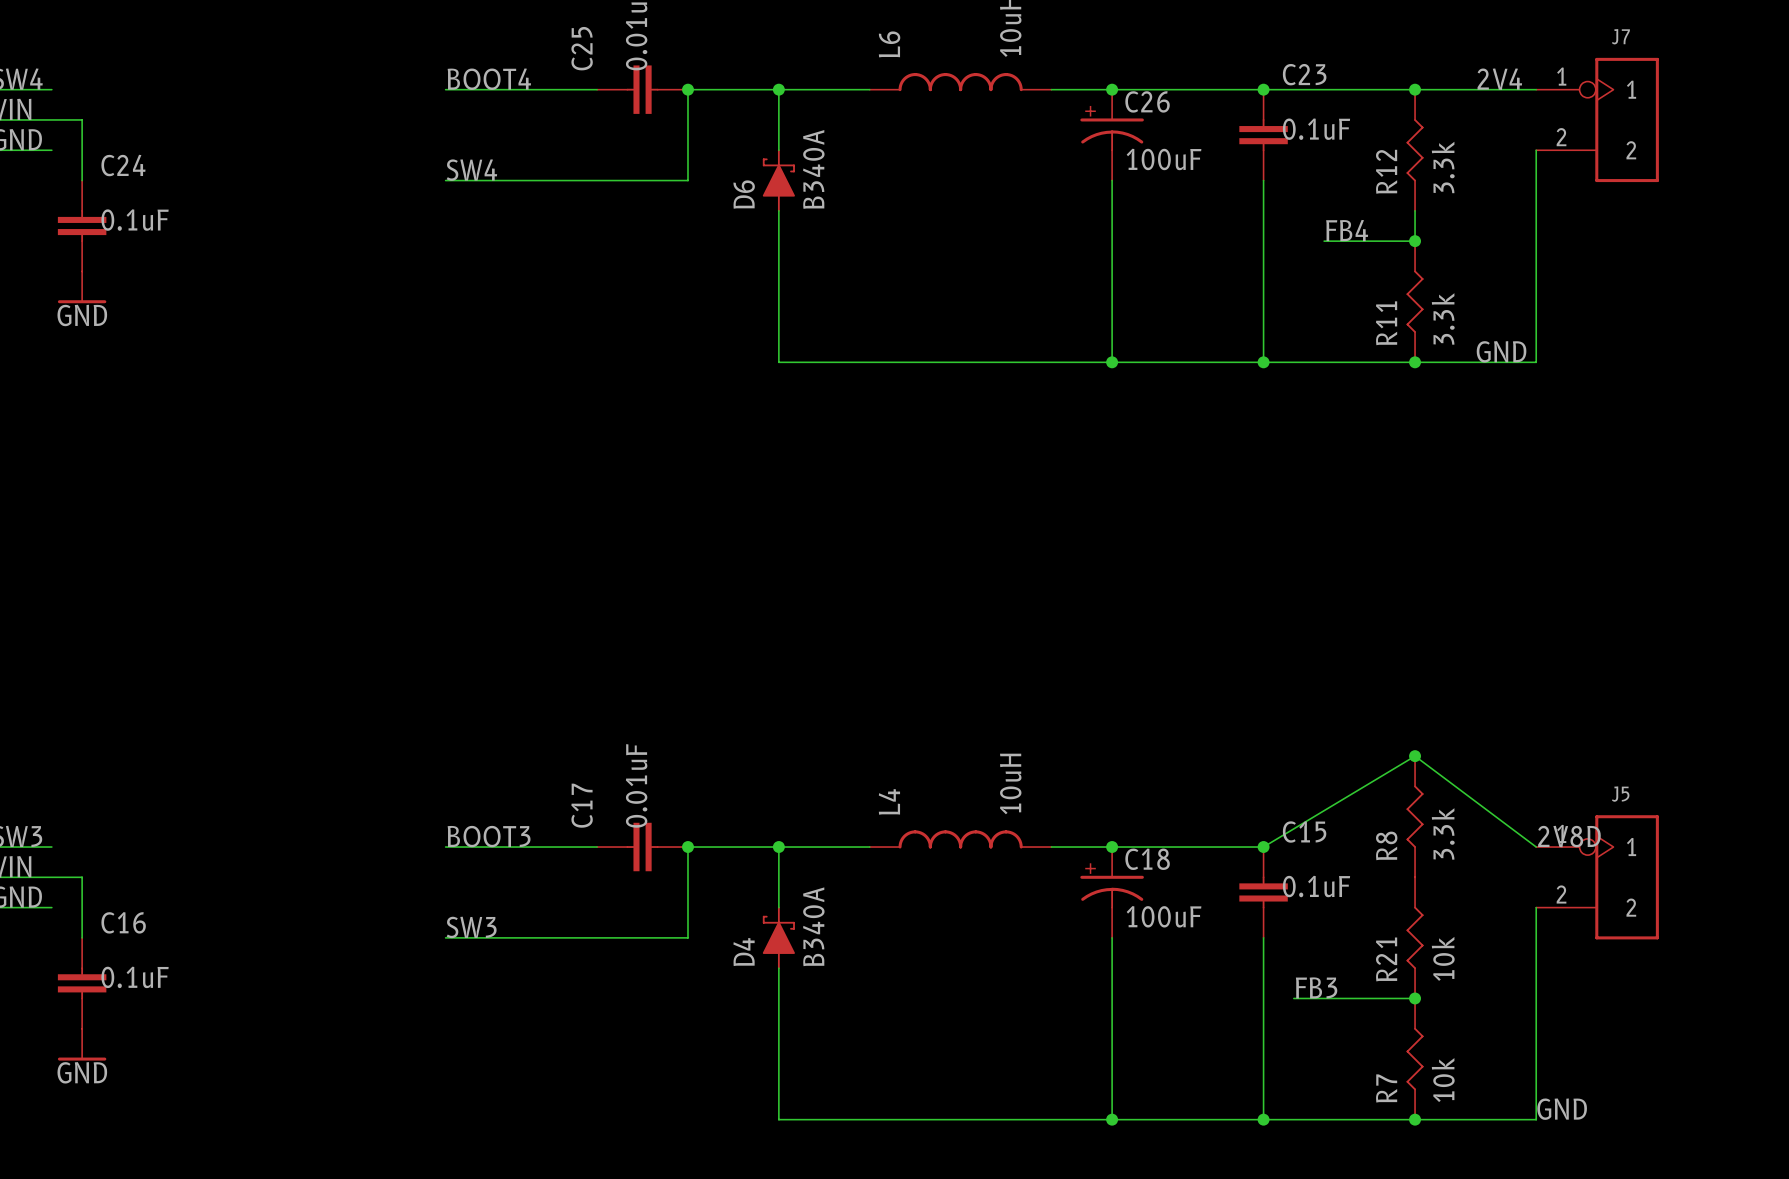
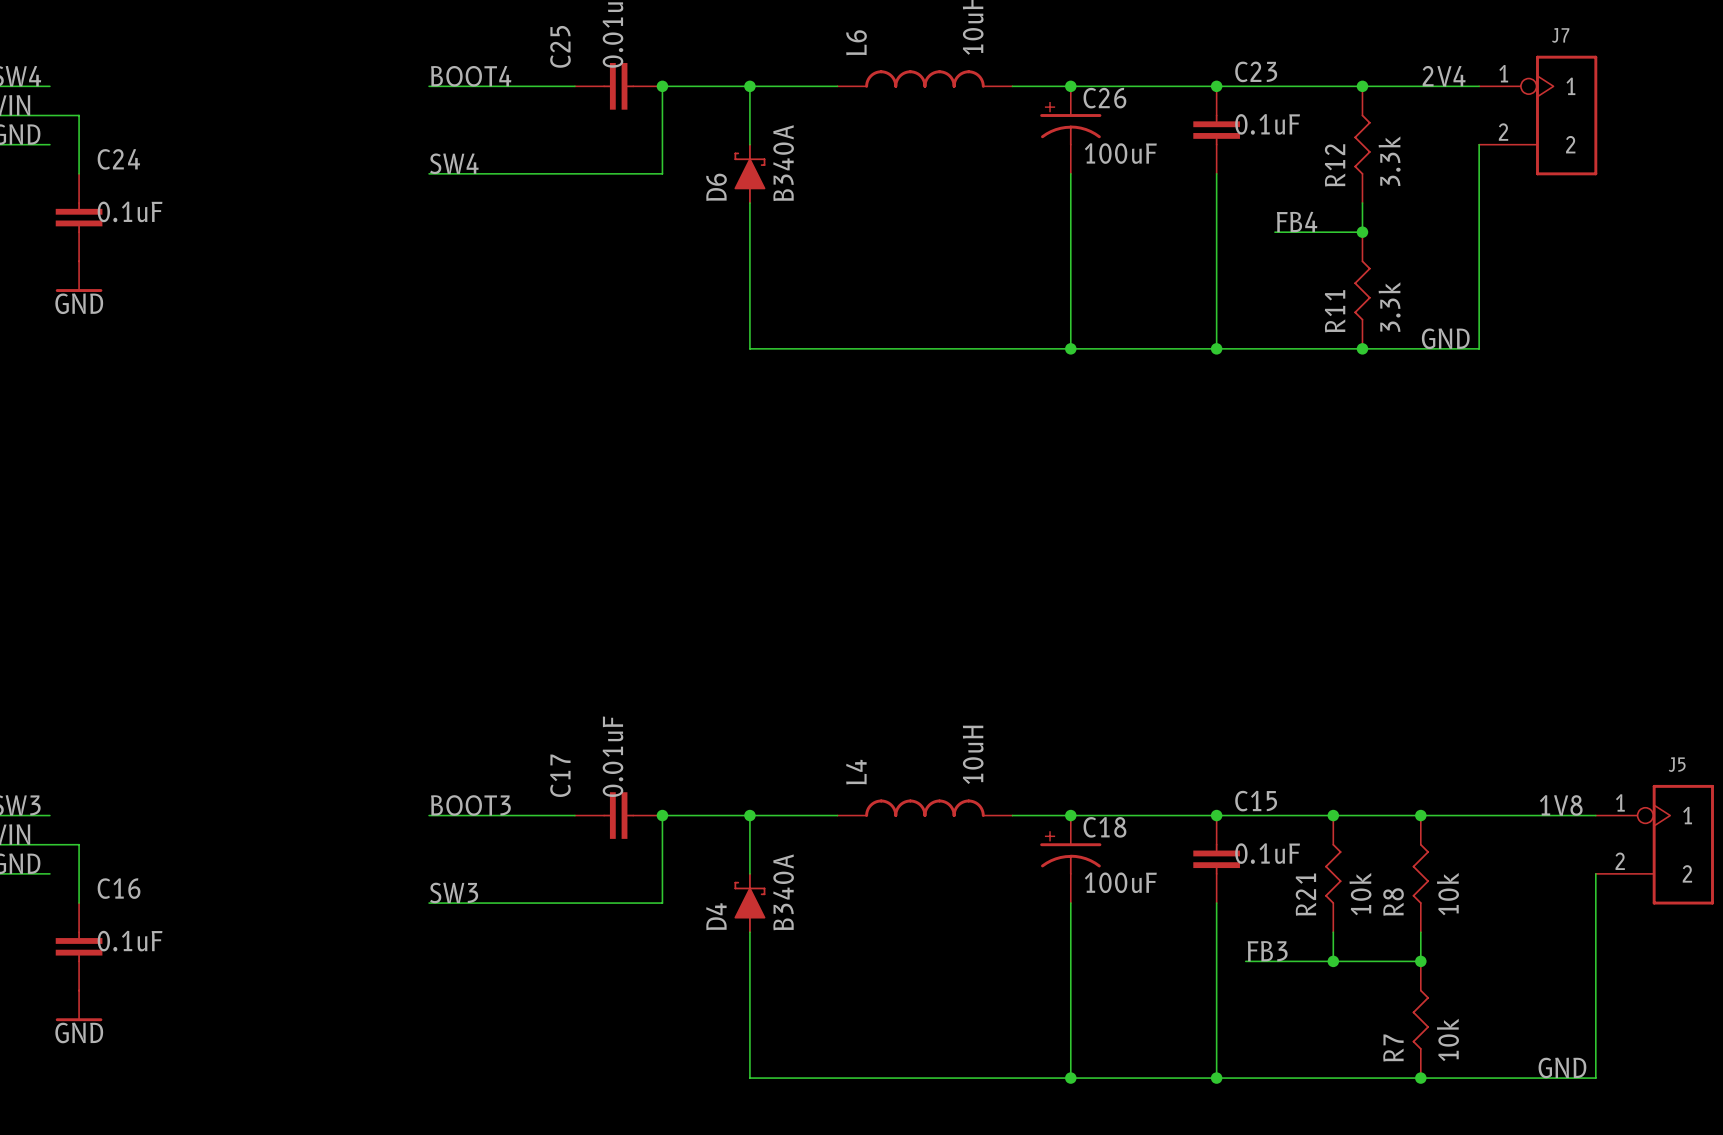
junction: (1415, 756) -> none
R8 position: (1415, 816) -> (1420, 873)
R8 value: 3.3k (1443, 833) -> 10k (1447, 894)
label: 2V8D (1569, 836) -> none
label: none -> 1V8 (1561, 805)
wire: (1263, 847) (1415, 756) (1536, 847) -> (1216, 815) (1595, 815)
junction: none -> (1333, 815)
junction: none -> (1420, 815)
J5 position: (1597, 877) -> (1654, 844)
wire: (1536, 907) (1536, 1119) -> (1595, 873) (1595, 1078) (1479, 1078)
R21 position: (1415, 937) -> (1333, 873)
wire: none -> (1333, 932) (1333, 961)
wire: none -> (1420, 932) (1420, 961) (1362, 961)
junction: none -> (1333, 961)
junction: (1415, 998) -> none
junction: none -> (1420, 961)
R7 position: (1415, 1059) -> (1420, 1019)
label position: GND (1562, 1109) -> GND (1562, 1067)
junction position: (1415, 1119) -> (1420, 1078)

